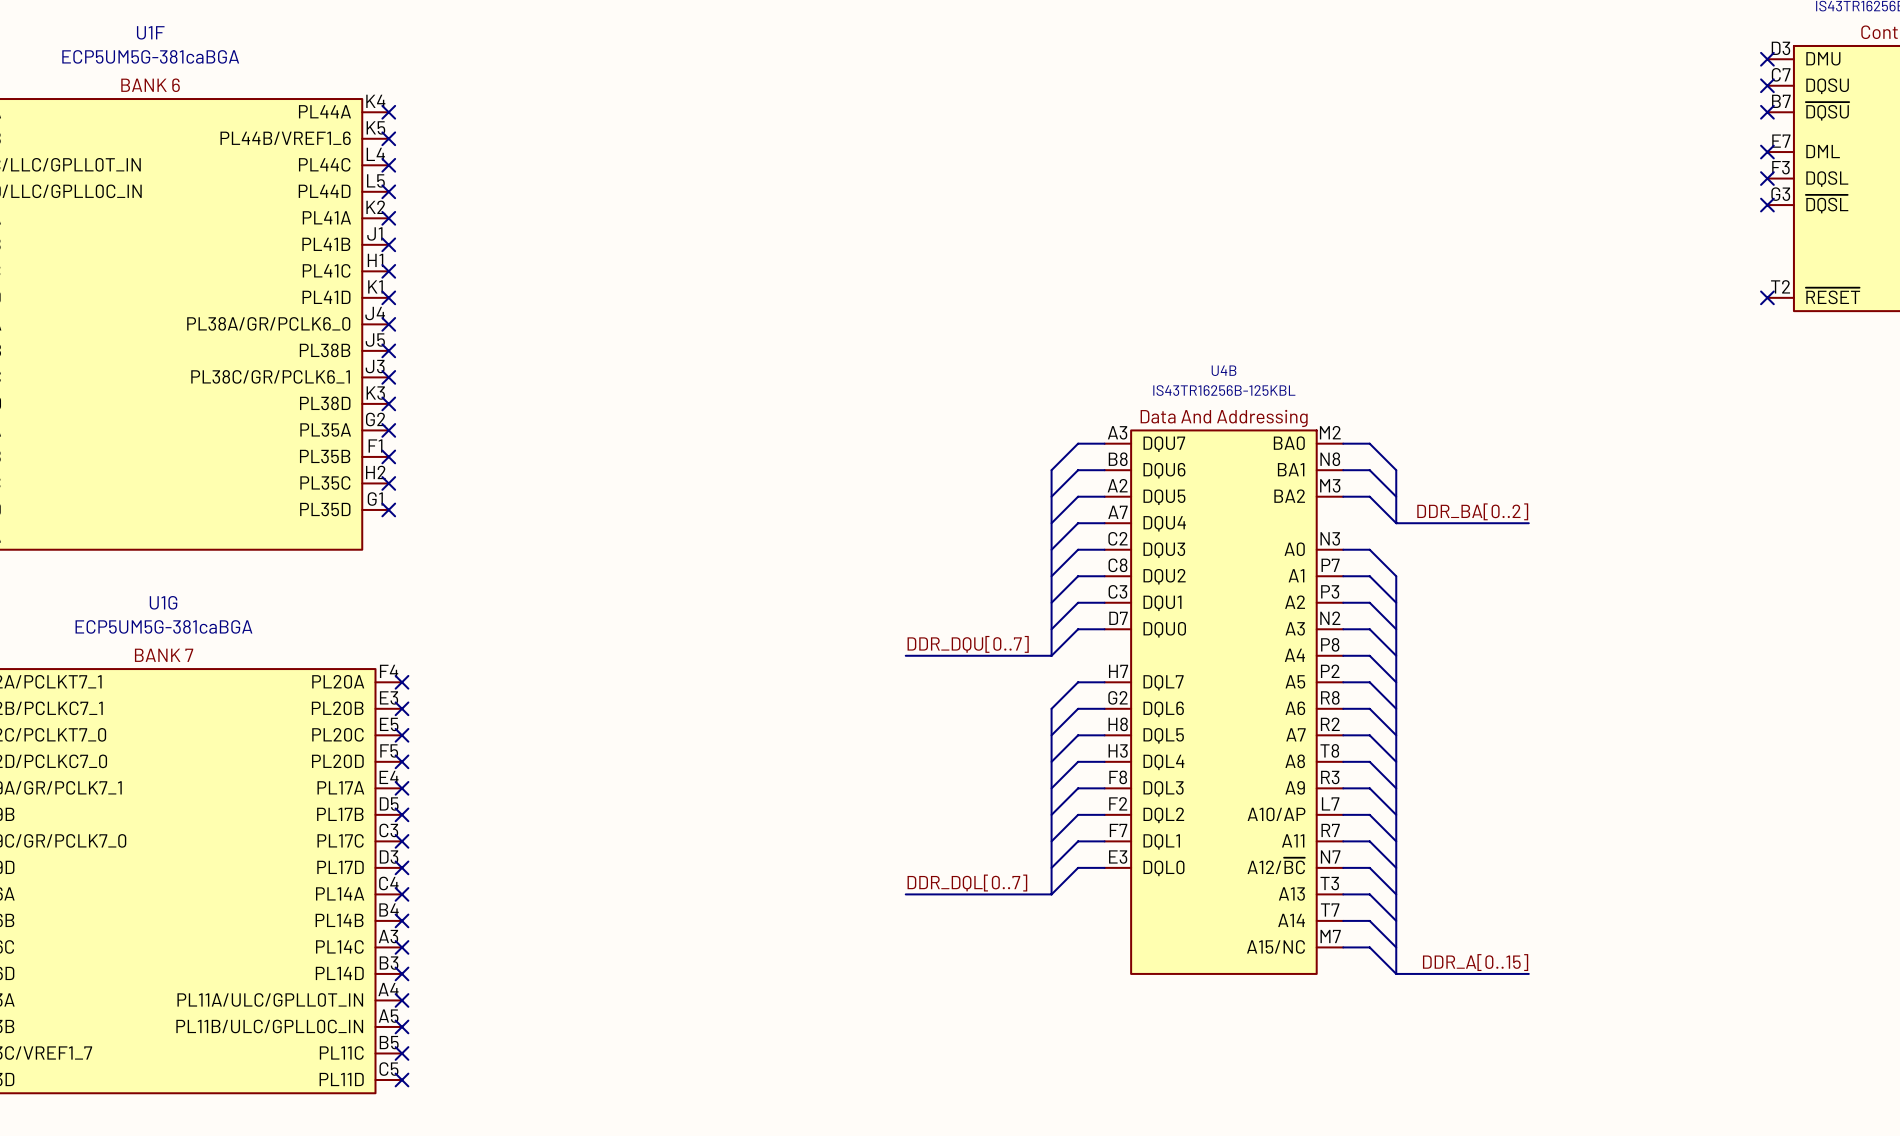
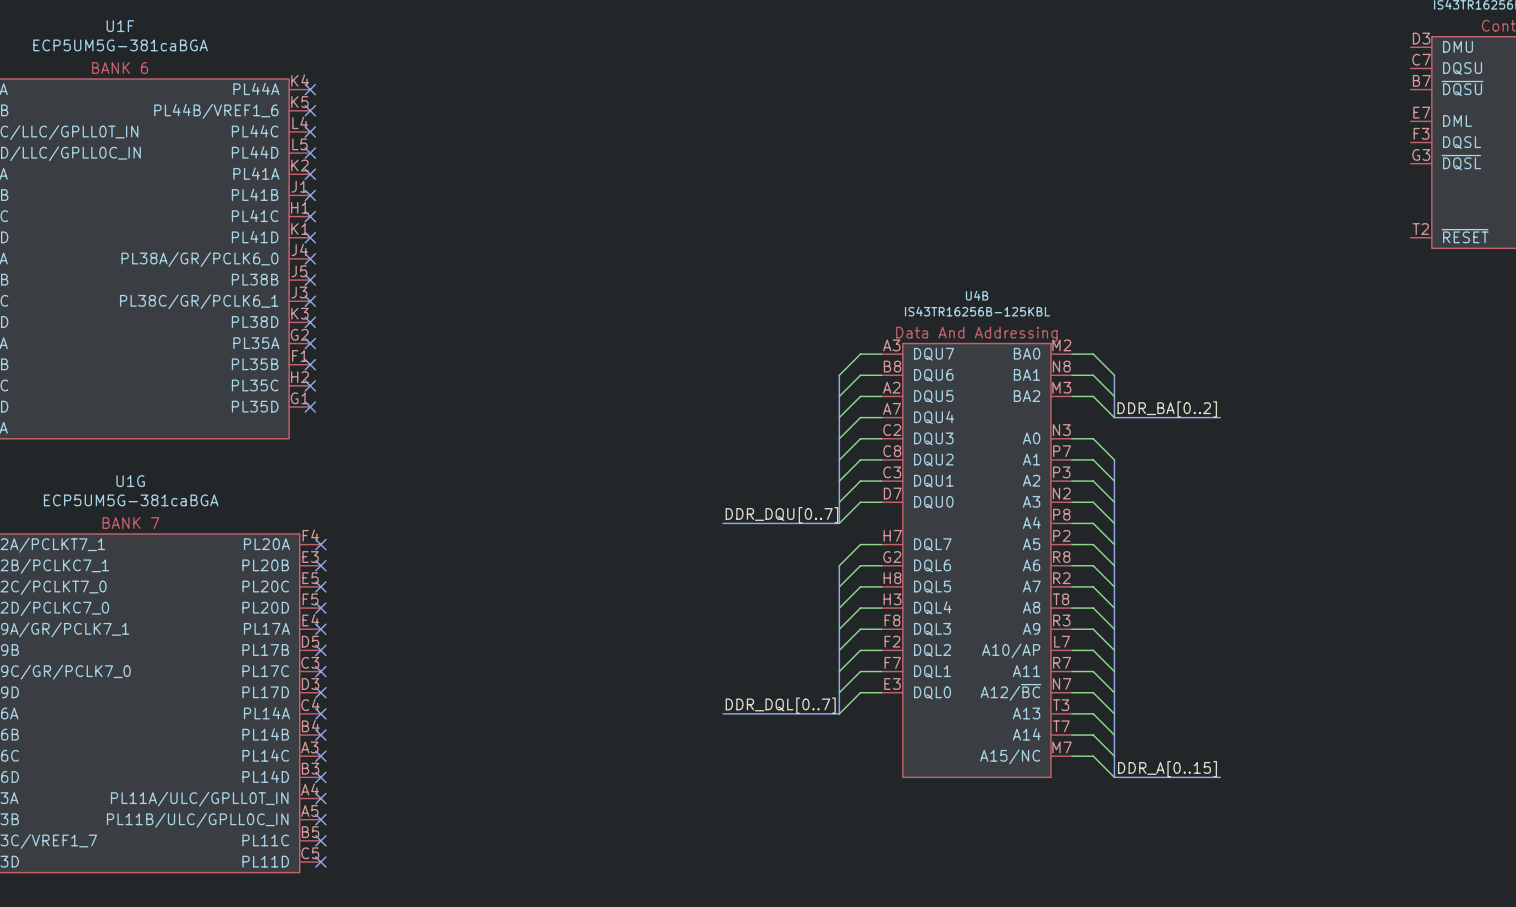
no-connect mark: (1767, 59) -> none
no-connect mark: (1767, 85) -> none
no-connect mark: (1767, 112) -> none
no-connect mark: (1767, 152) -> none
no-connect mark: (1767, 178) -> none
no-connect mark: (1767, 205) -> none
no-connect mark: (1767, 297) -> none

